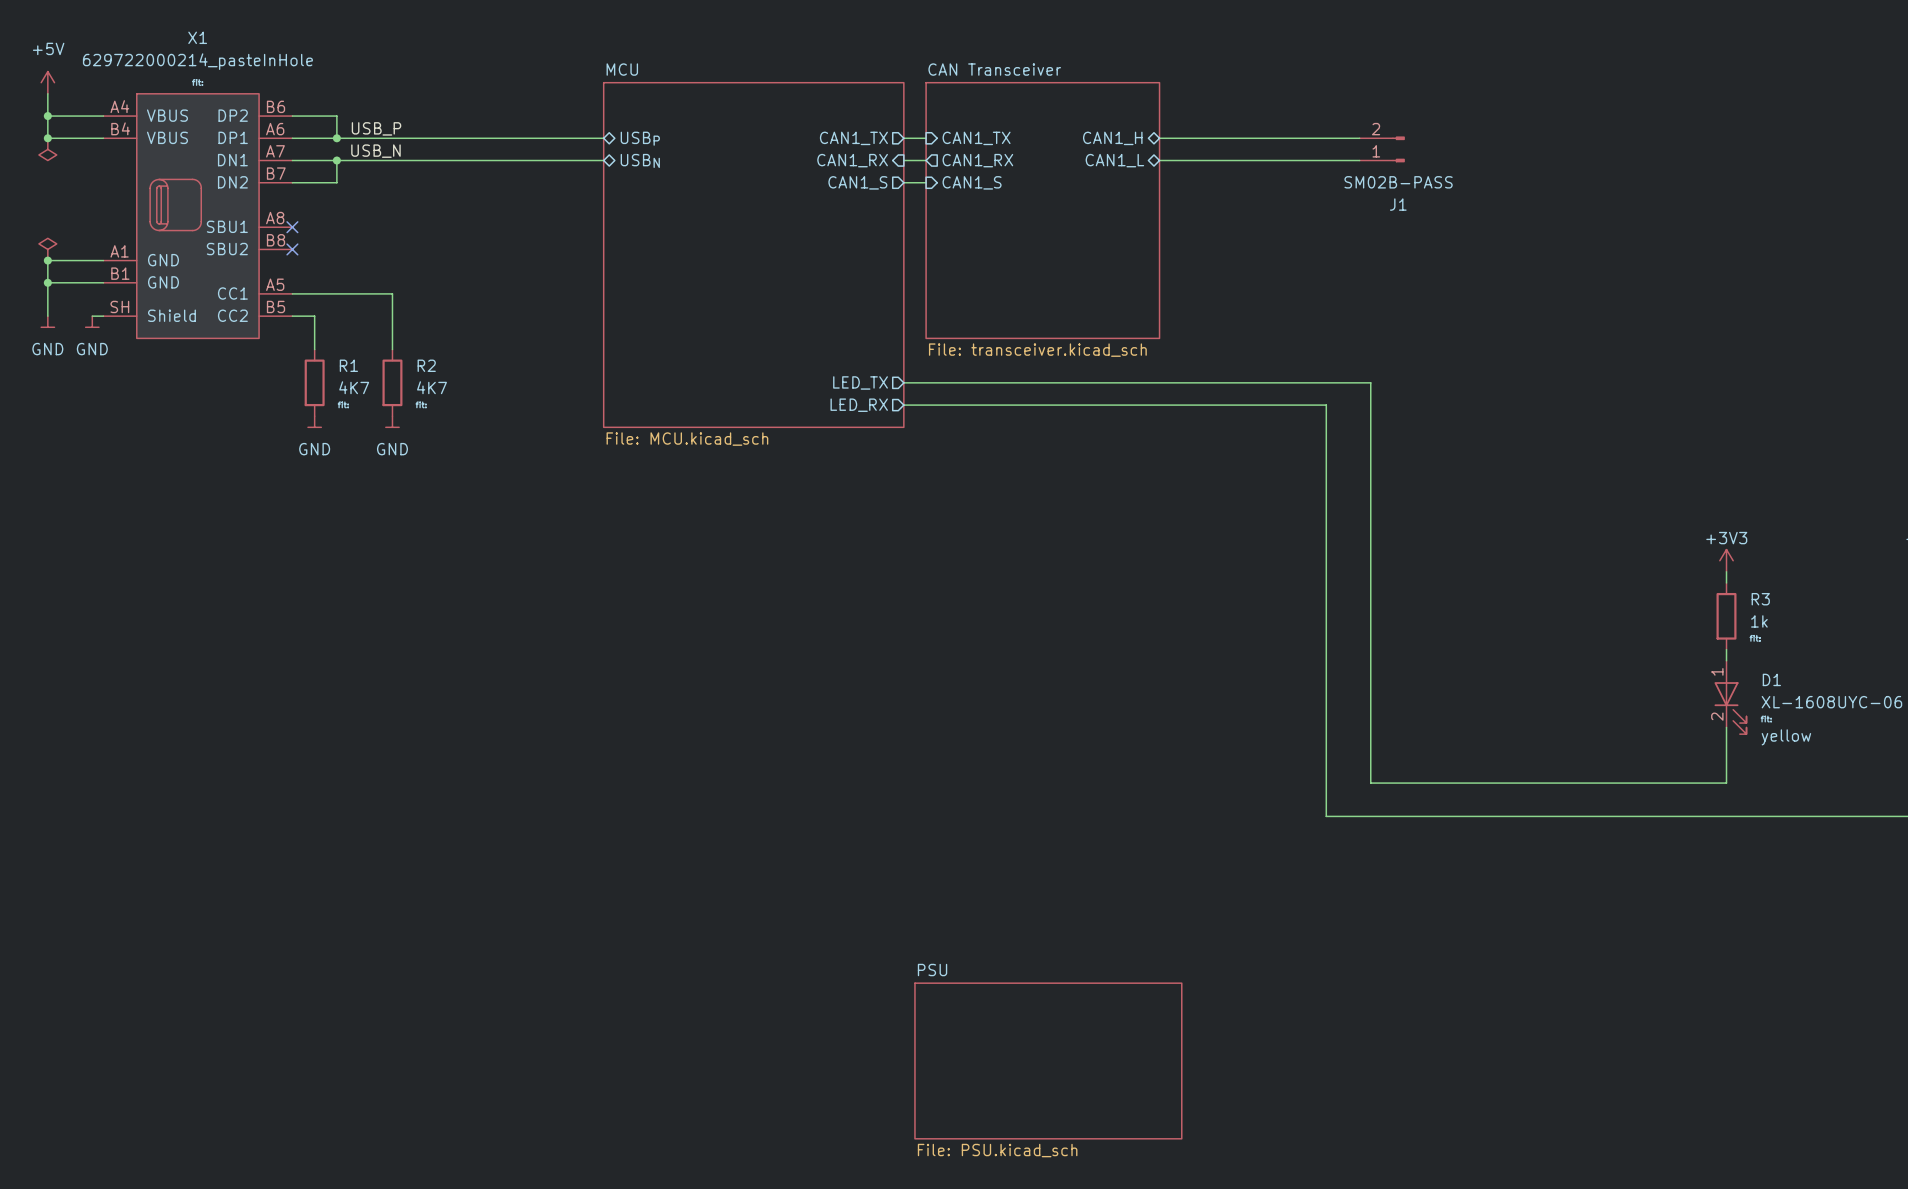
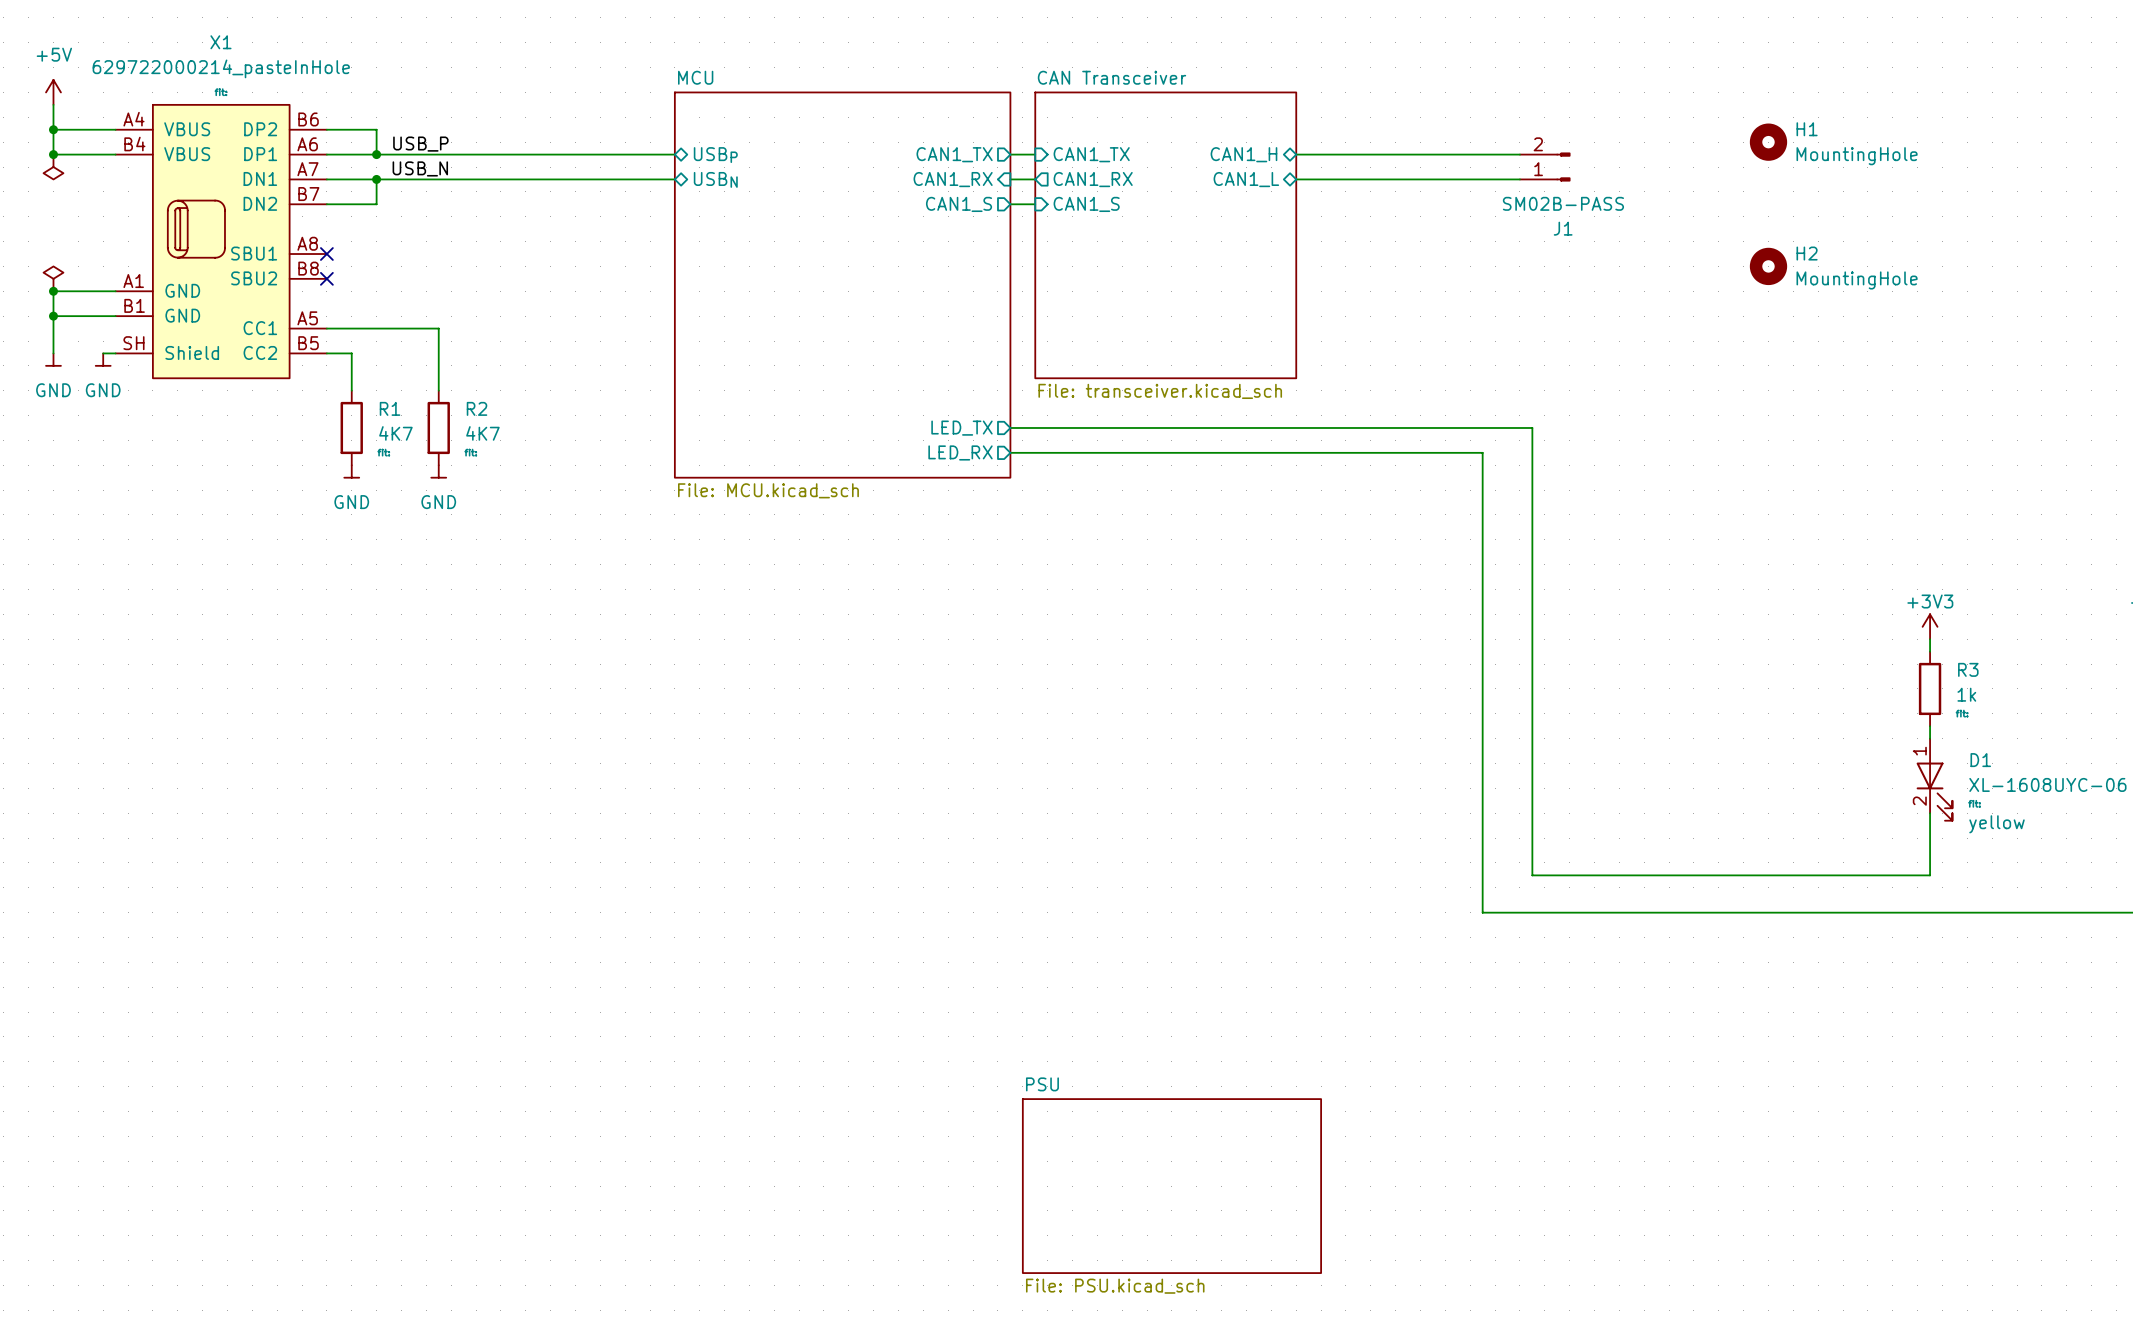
H1: none -> MountingHole (1768, 142)
H2: none -> MountingHole (1768, 266)

